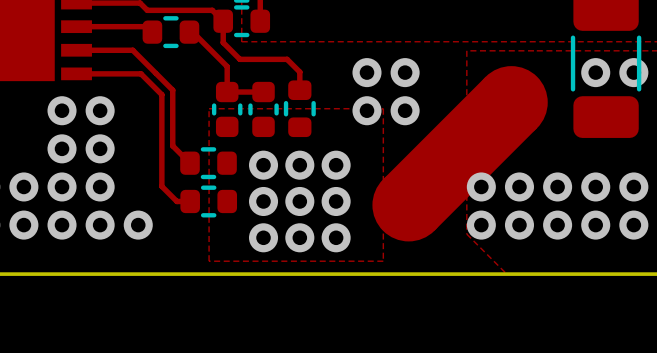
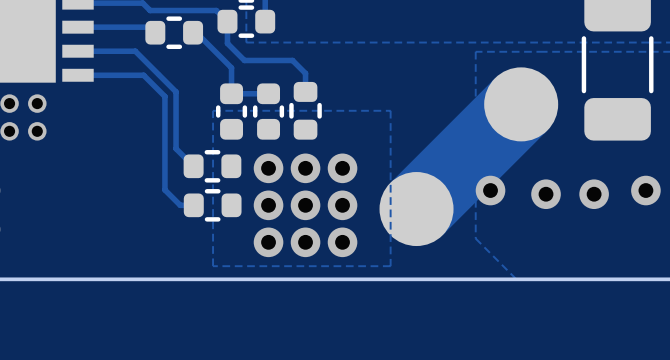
via: (366, 72) -> none
via: (405, 72) -> none
via: (595, 72) -> none
via: (633, 72) -> none
via: none -> (9, 103)
via: none -> (37, 103)
via: (62, 110) -> none
via: (100, 110) -> none
via: (366, 110) -> none
via: (405, 110) -> none
via: none -> (9, 131)
via: none -> (37, 131)
via: (62, 148) -> none
via: (100, 148) -> none
via: (23, 186) -> none
via: (62, 186) -> none
via: (100, 186) -> none
via: (519, 186) -> none
via: (557, 186) -> none
via: (595, 186) -> none
via: none -> (546, 194)
via: none -> (594, 194)
via: (23, 225) -> none
via: (62, 225) -> none
via: (100, 225) -> none
via: (138, 225) -> none
via: (481, 225) -> none
via: (519, 225) -> none
via: (557, 225) -> none
via: (595, 225) -> none
via: (633, 225) -> none

